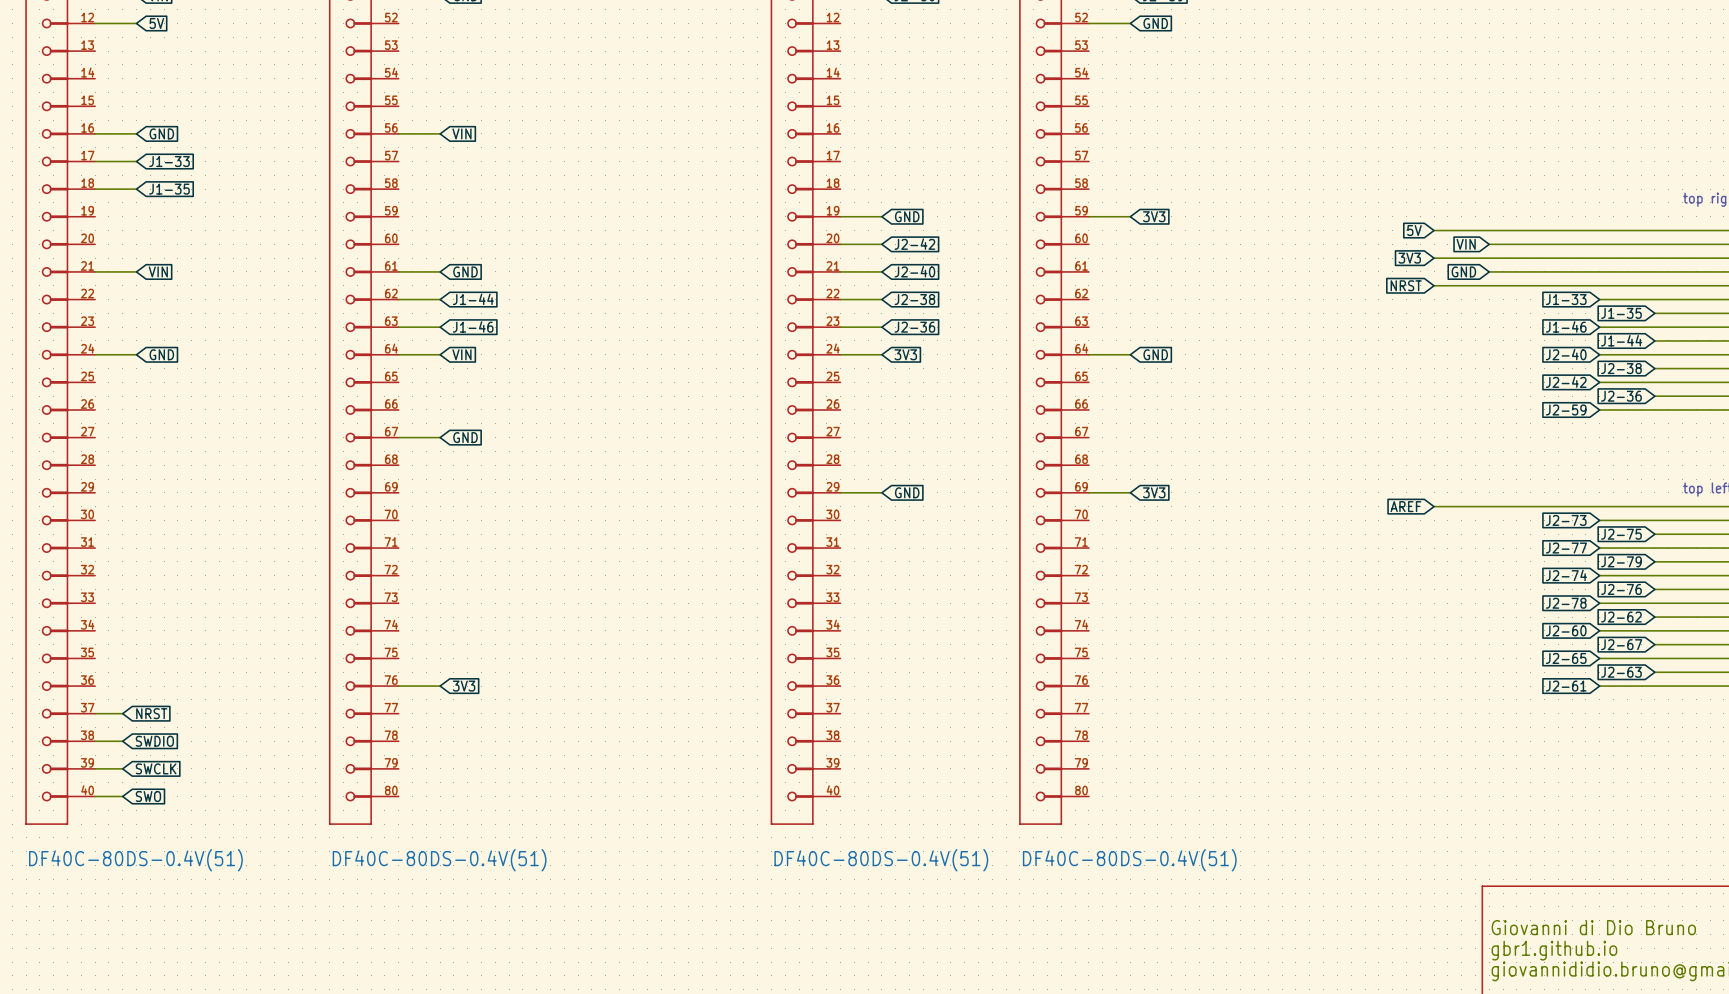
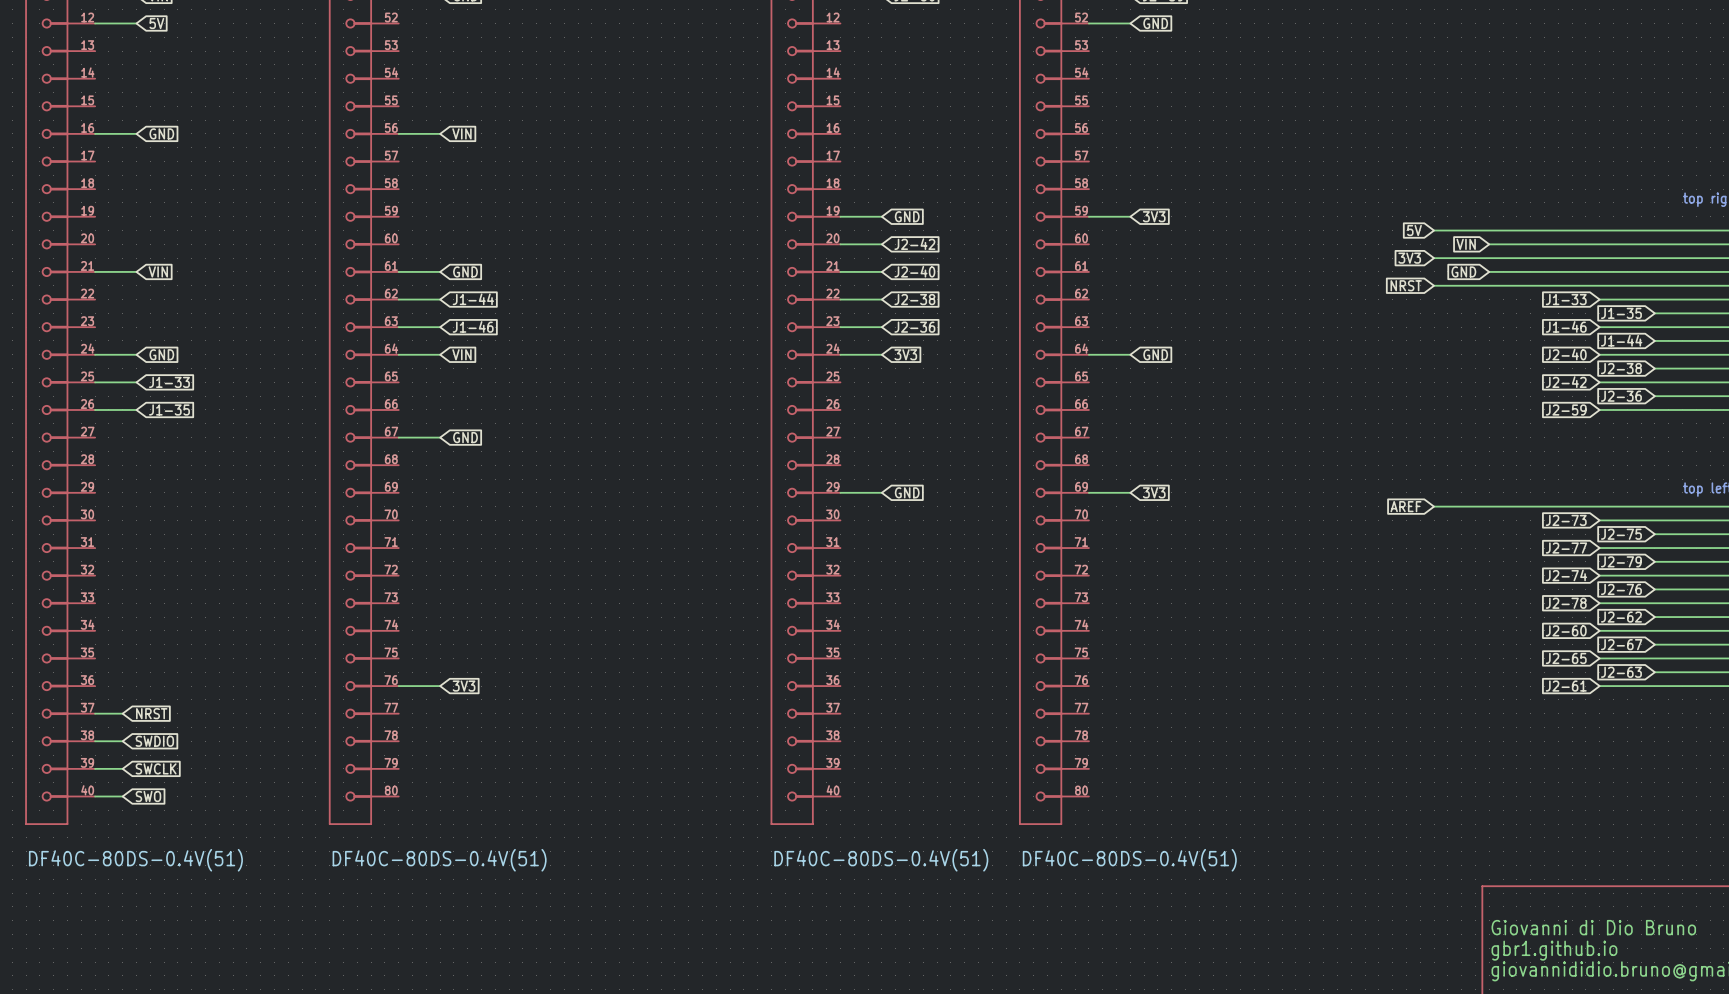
wire: (95, 161) (136, 161) -> none
global label: J1-33 (169, 161) -> none
wire: (95, 189) (136, 189) -> none
global label: J1-35 (169, 189) -> none
wire: none -> (95, 382) (136, 382)
global label: none -> J1-33 (169, 382)
wire: none -> (95, 409) (136, 409)
global label: none -> J1-35 (169, 409)

